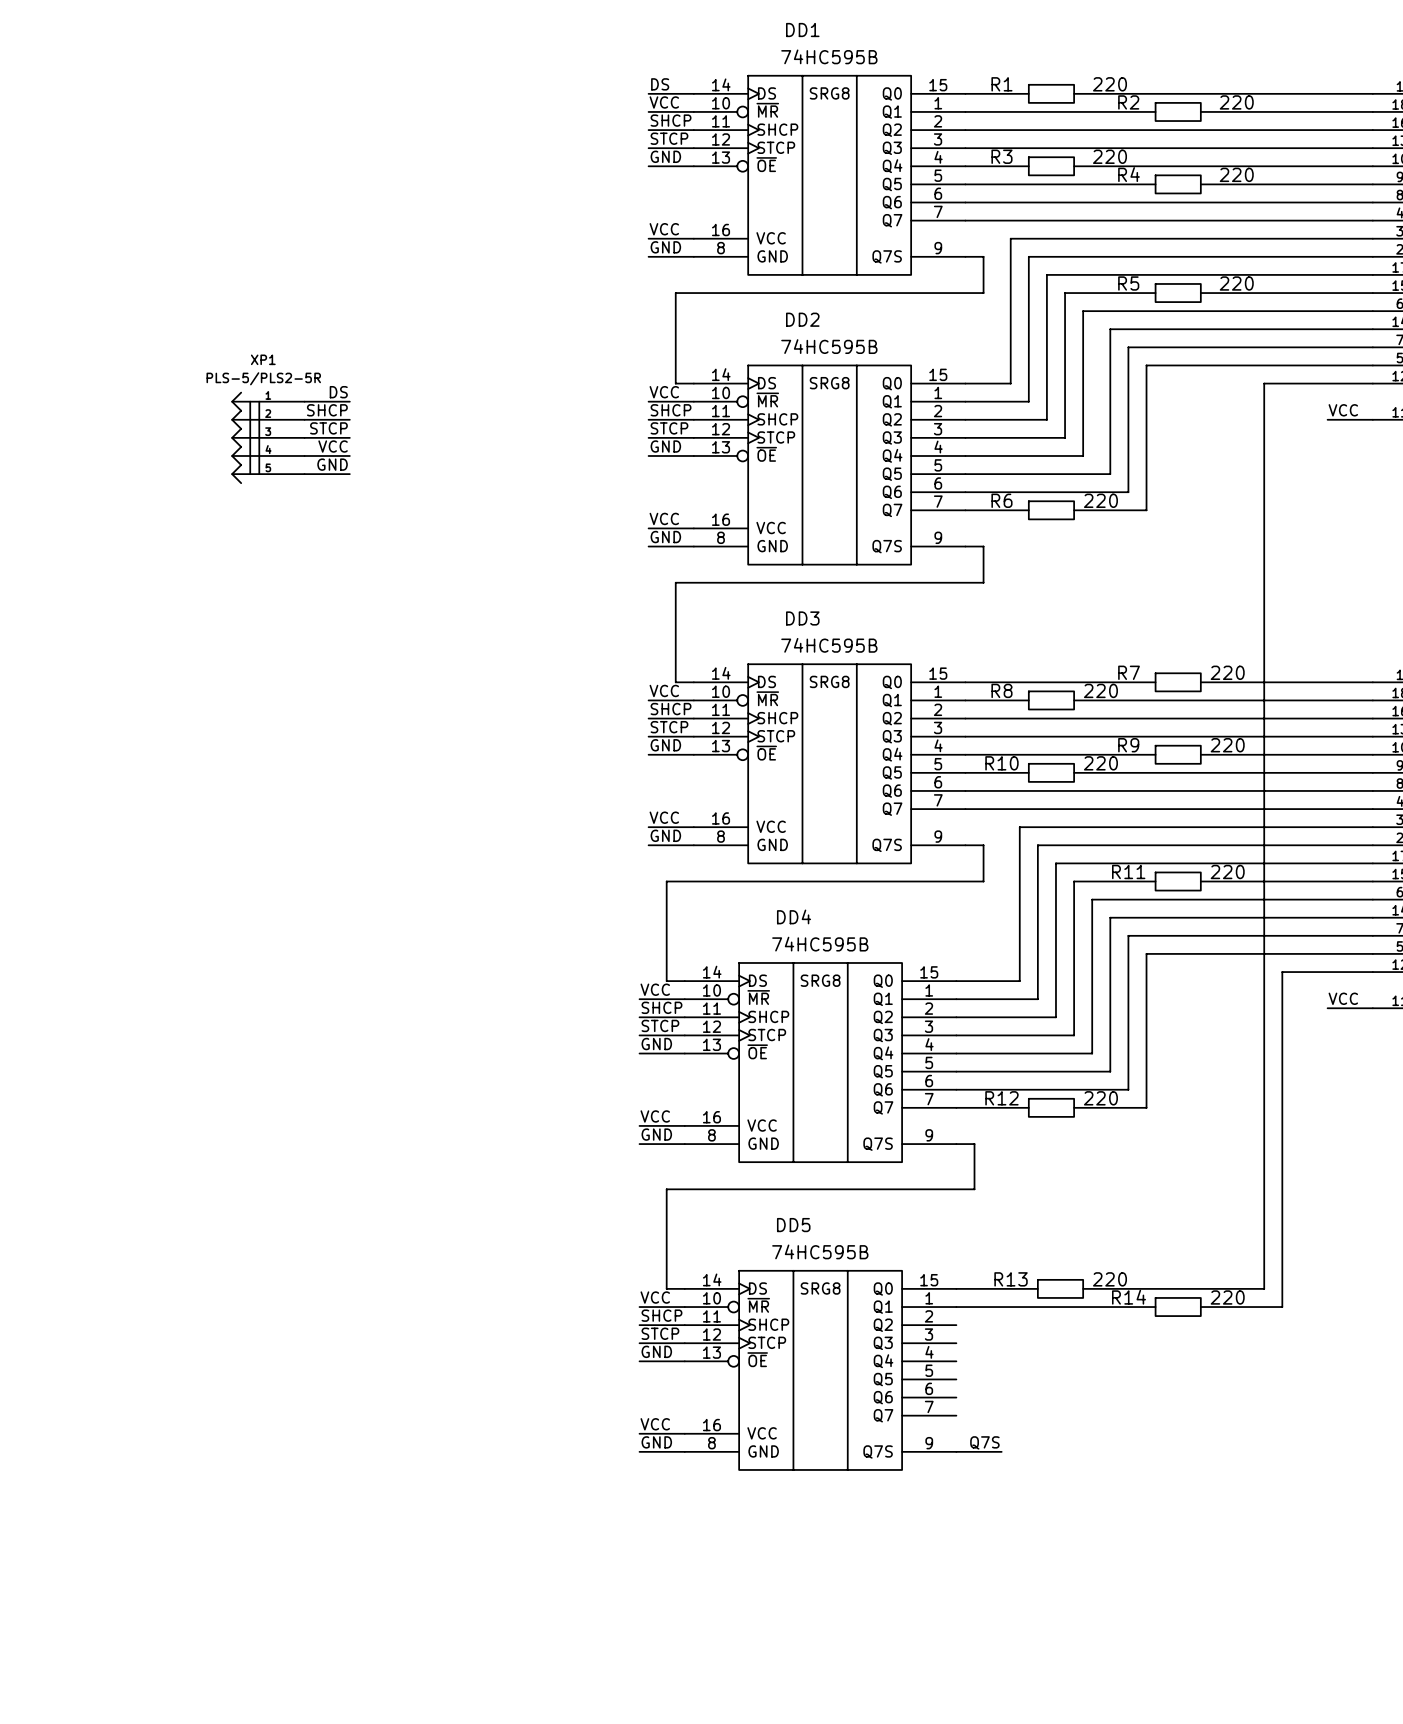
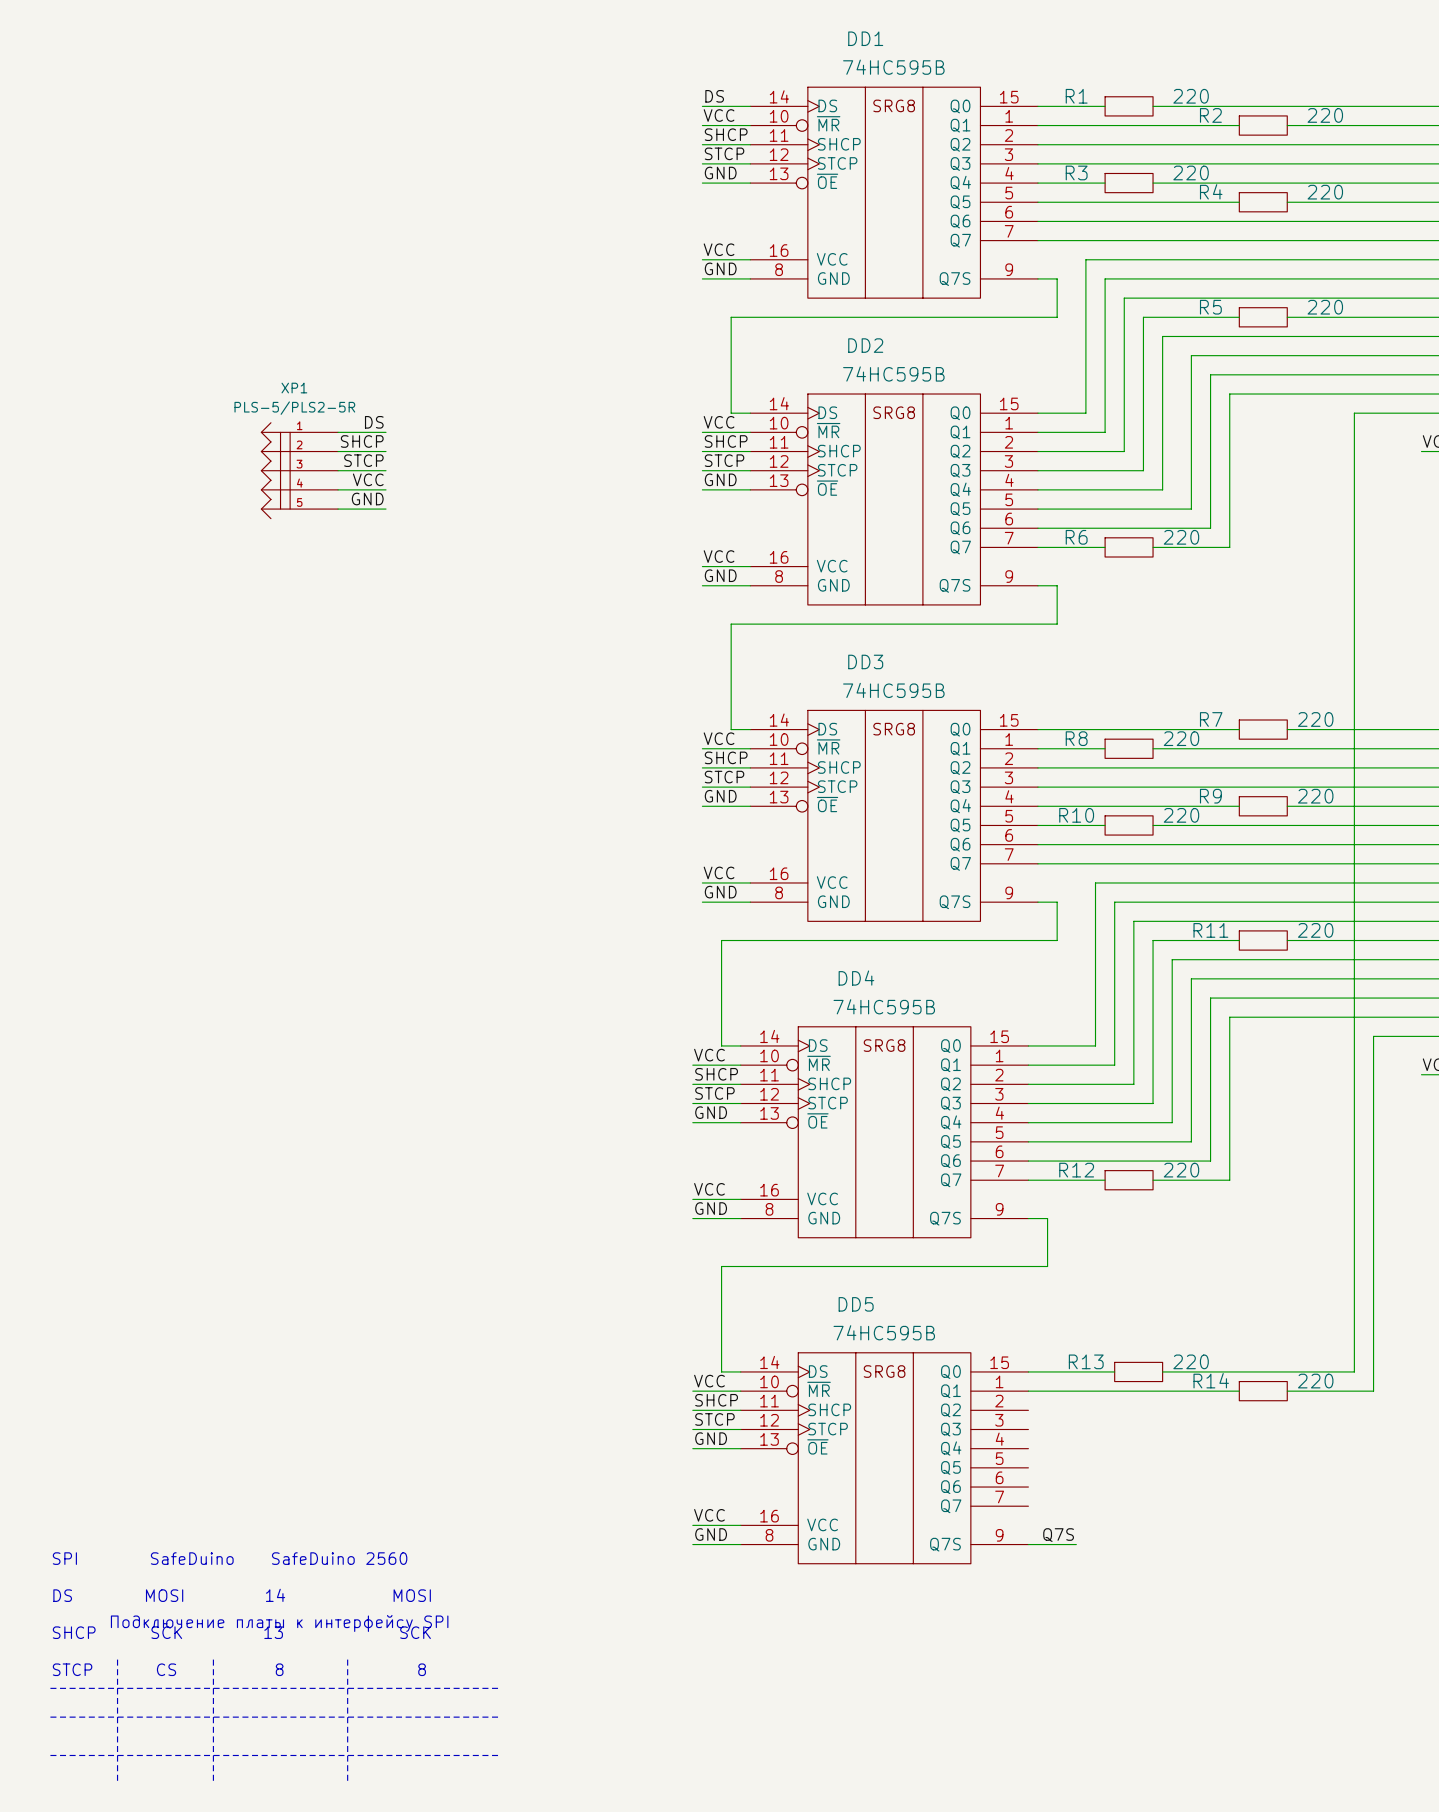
text: none -> SPI SafeDuino SafeDuino 2560 (230, 1558)
text: none -> DS MOSI 14 MOSI (242, 1595)
text: none -> Подключение платы к интерфейсу SPI (279, 1623)
text: none -> SHCP SCK 13 SCK (241, 1632)
line: none -> (117, 1659) (117, 1784)
line: none -> (213, 1659) (213, 1784)
line: none -> (347, 1659) (347, 1784)
text: none -> STCP CS 8 8 (239, 1669)
line: none -> (50, 1688) (501, 1688)
line: none -> (50, 1717) (501, 1717)
line: none -> (50, 1755) (501, 1755)

